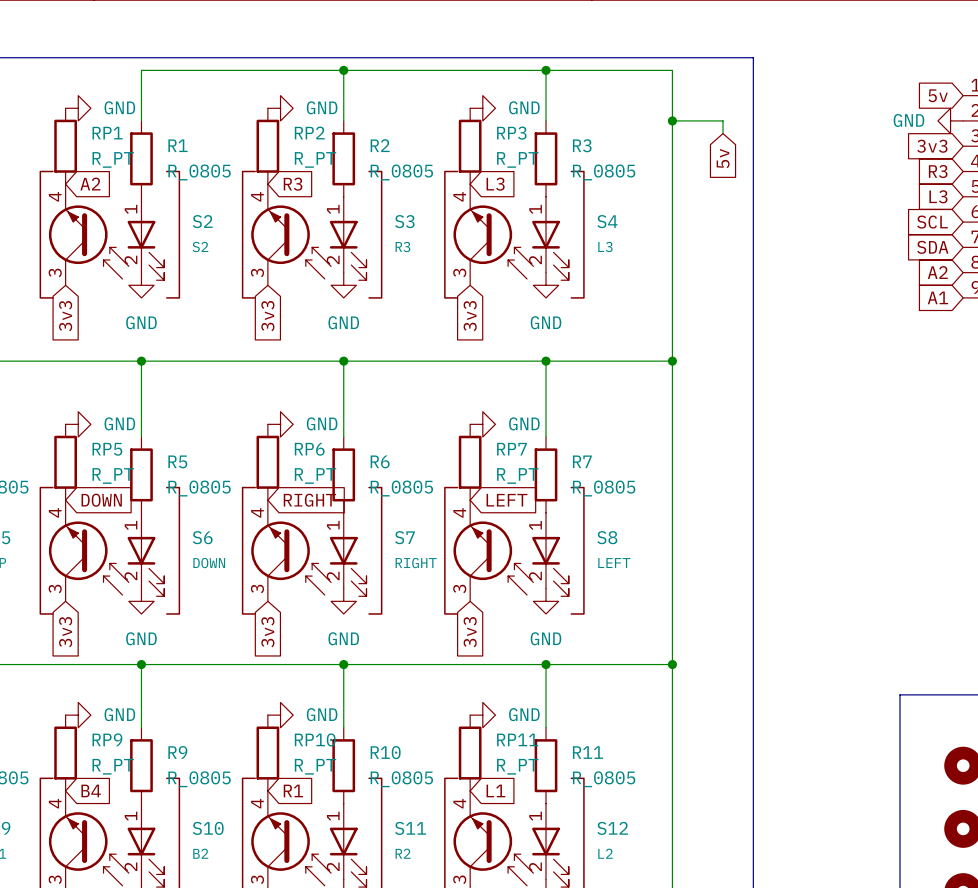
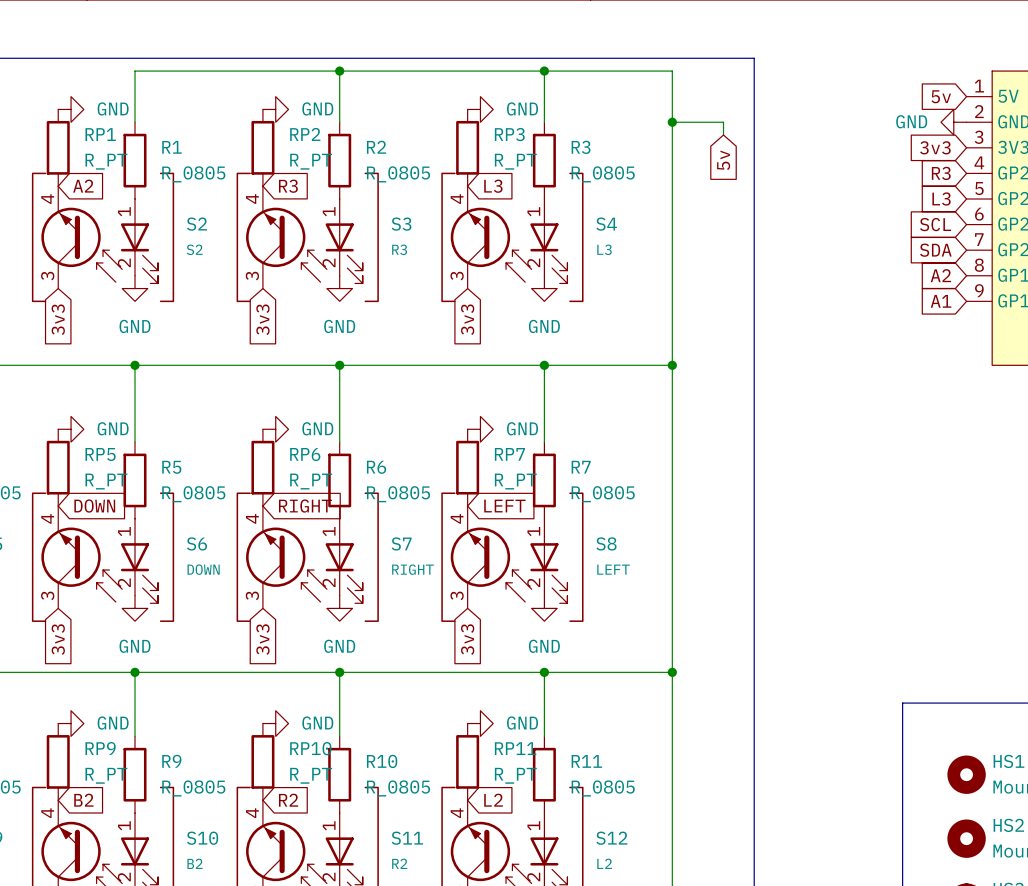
global label: B4 (91, 790) -> B2 (83, 800)
global label: R1 (293, 790) -> R2 (288, 800)
global label: L1 (495, 790) -> L2 (493, 800)

